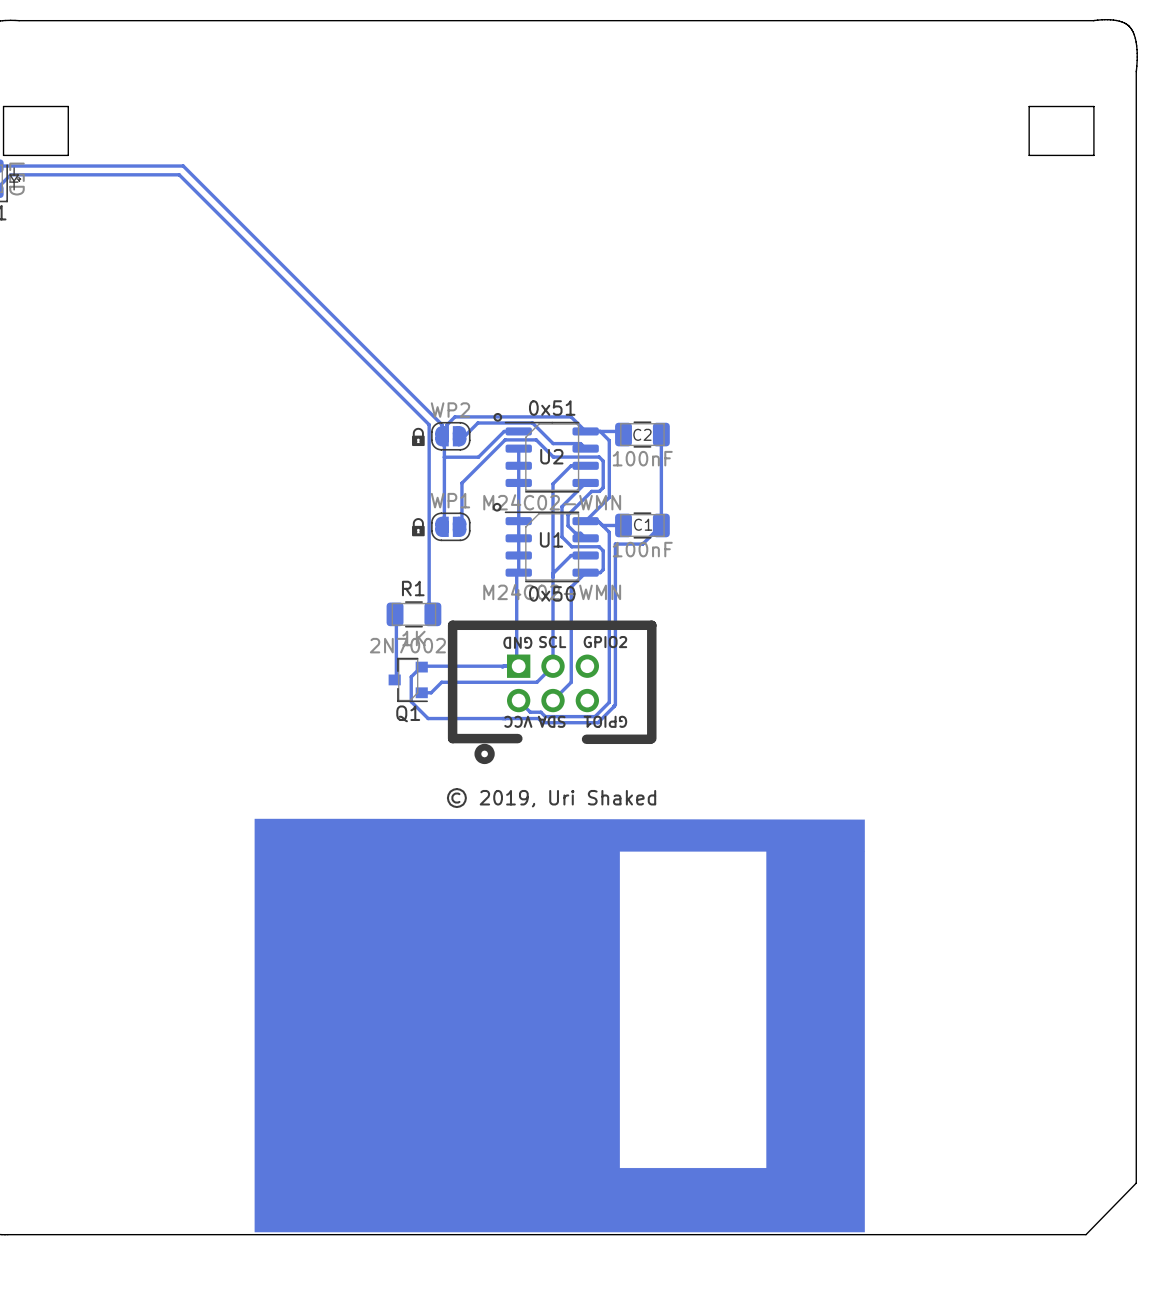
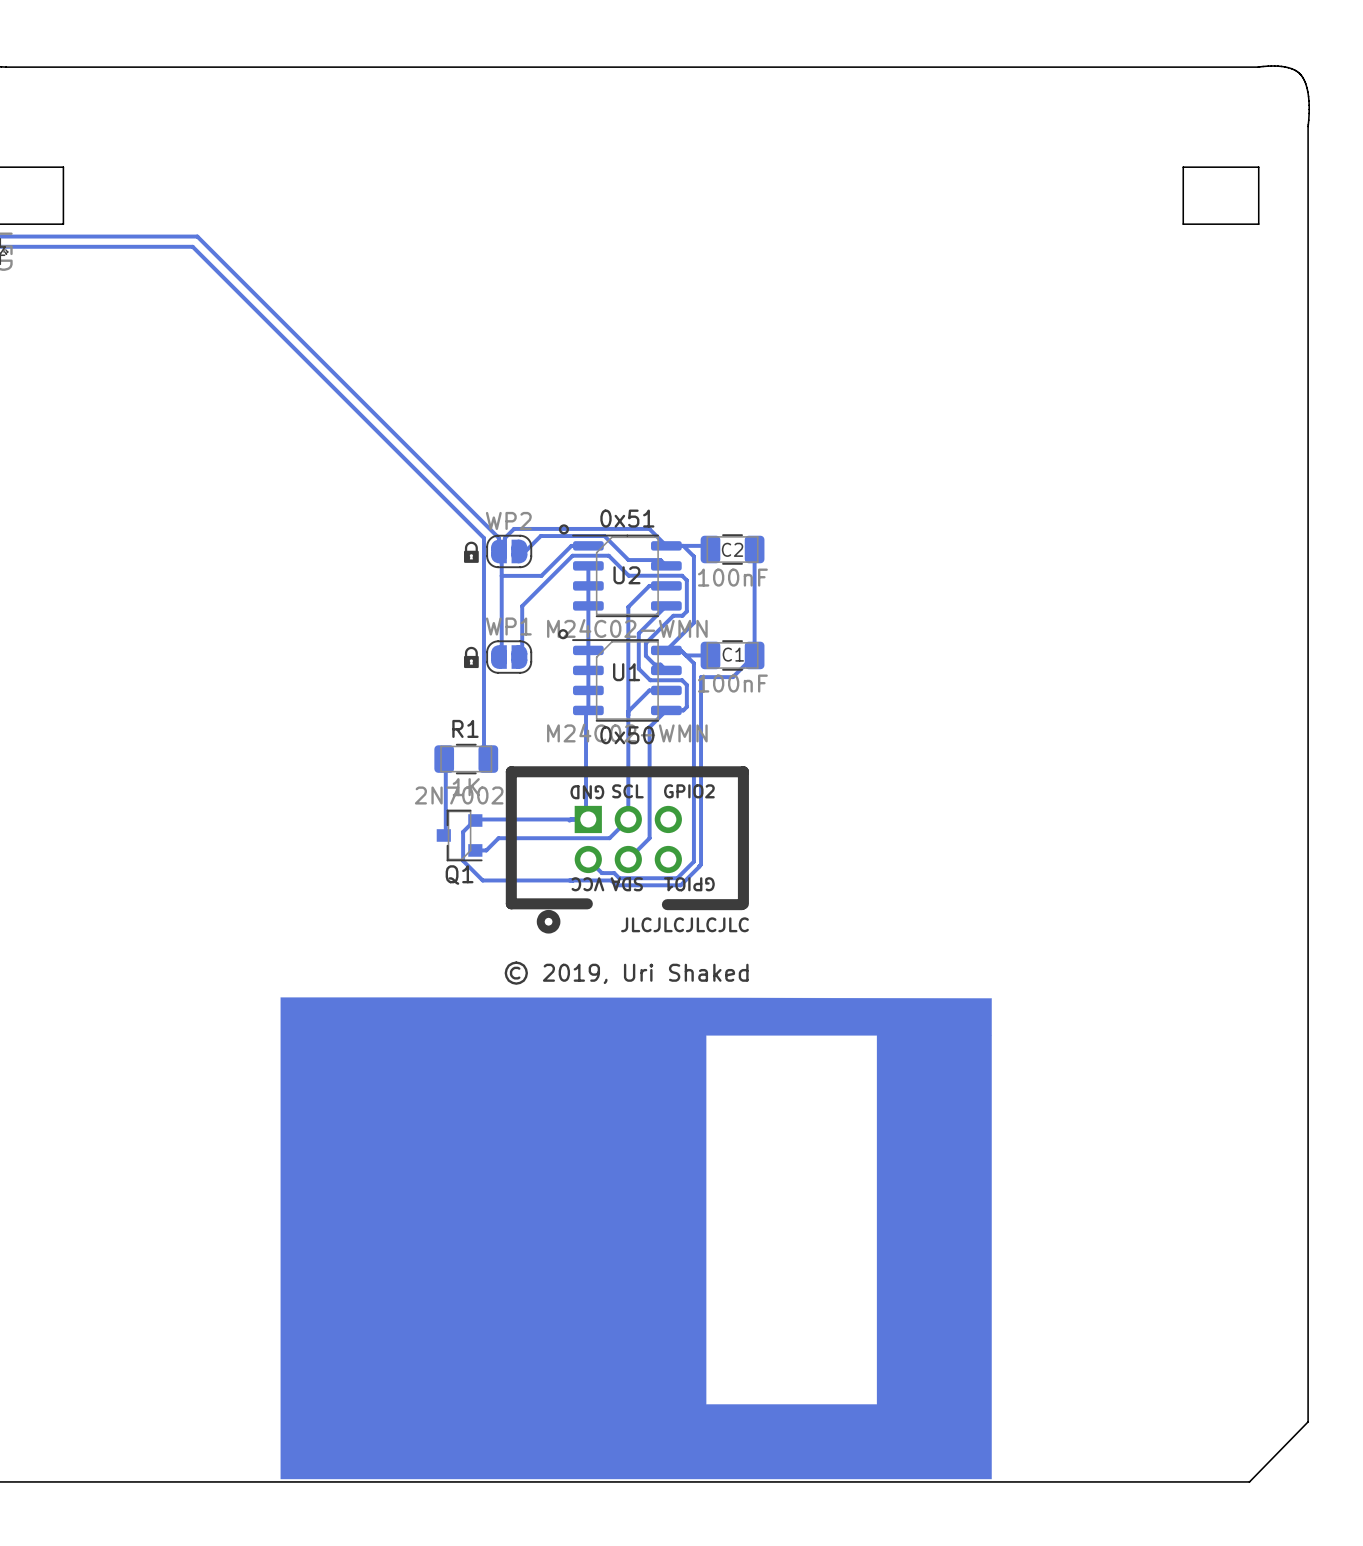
text: none -> JLCJLCJLCJLC (684, 924)

